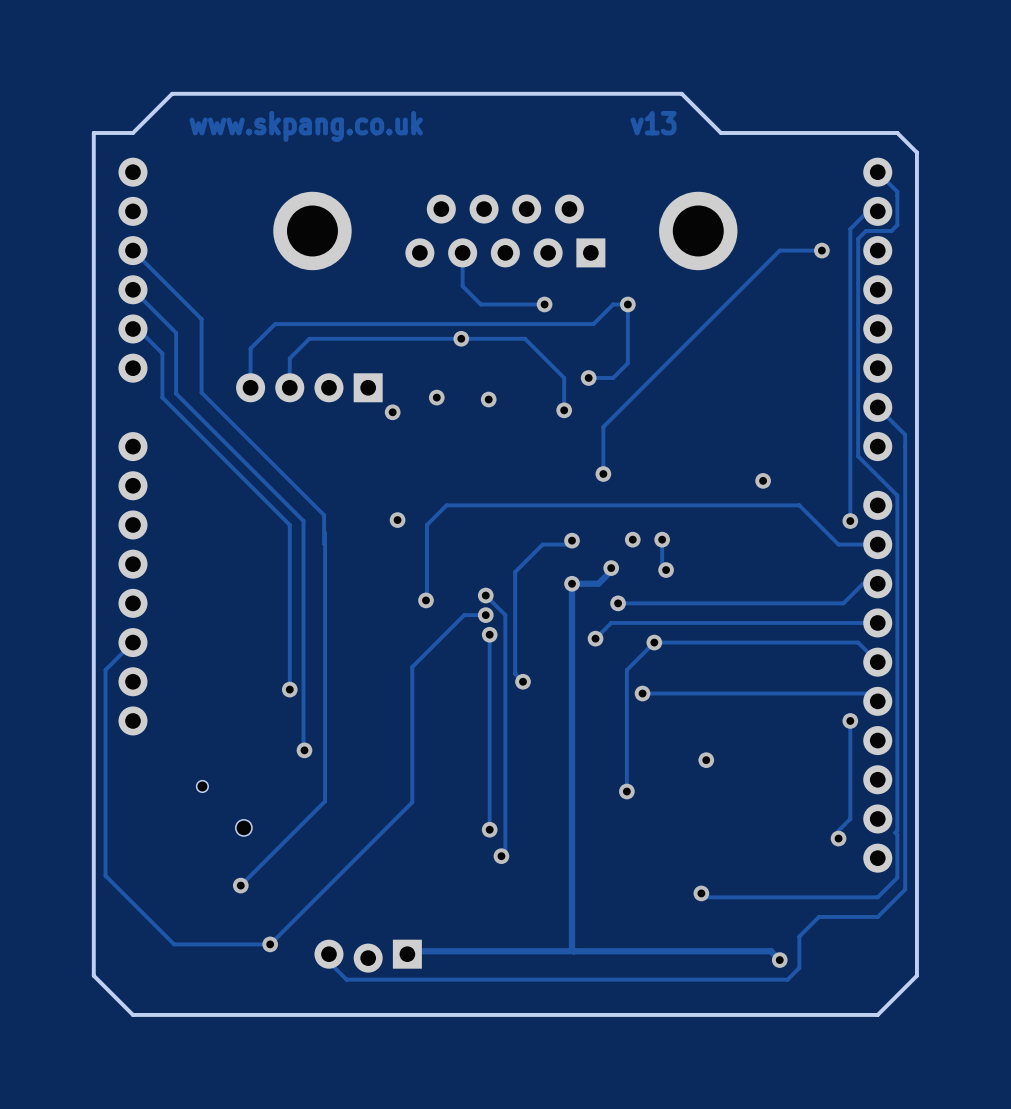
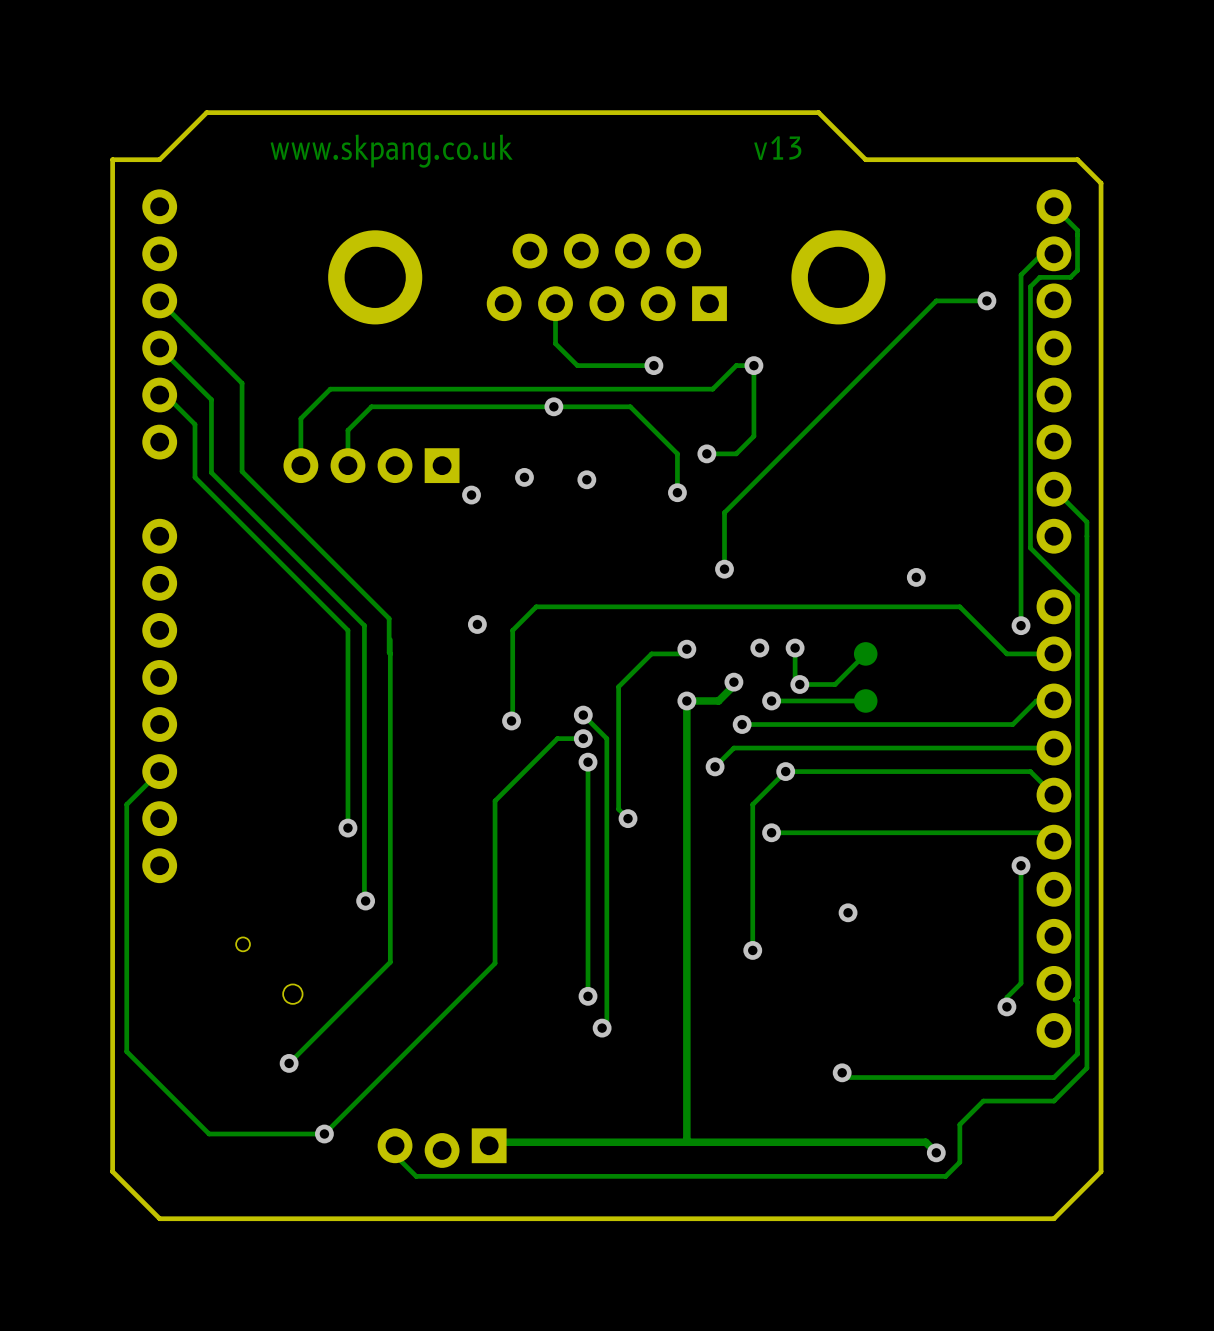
track: none -> (865, 653) (835, 684) (799, 684)
part: none -> (865, 653)
via: none -> (771, 700)
track: none -> (865, 700) (771, 700)
part: none -> (865, 700)

